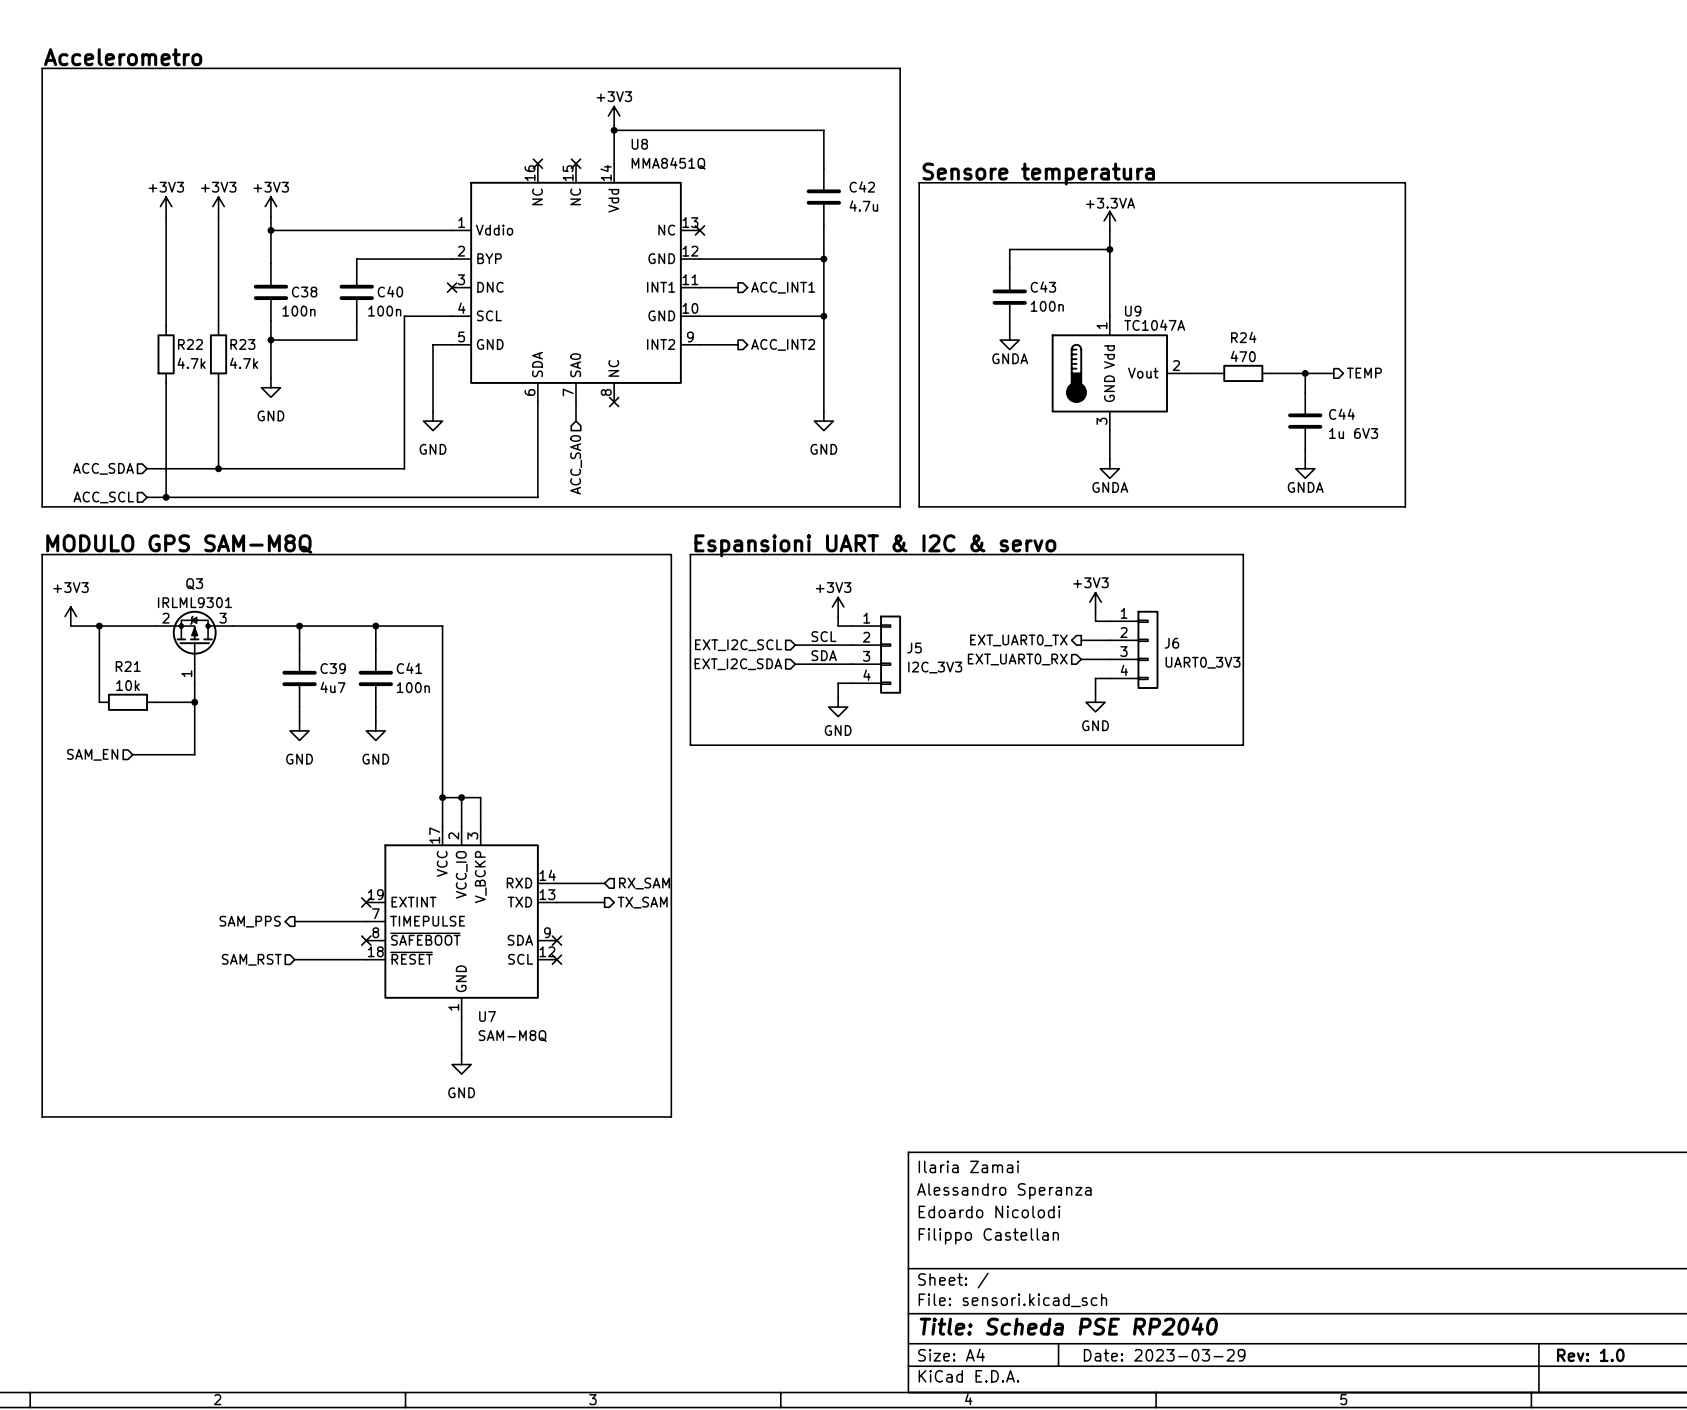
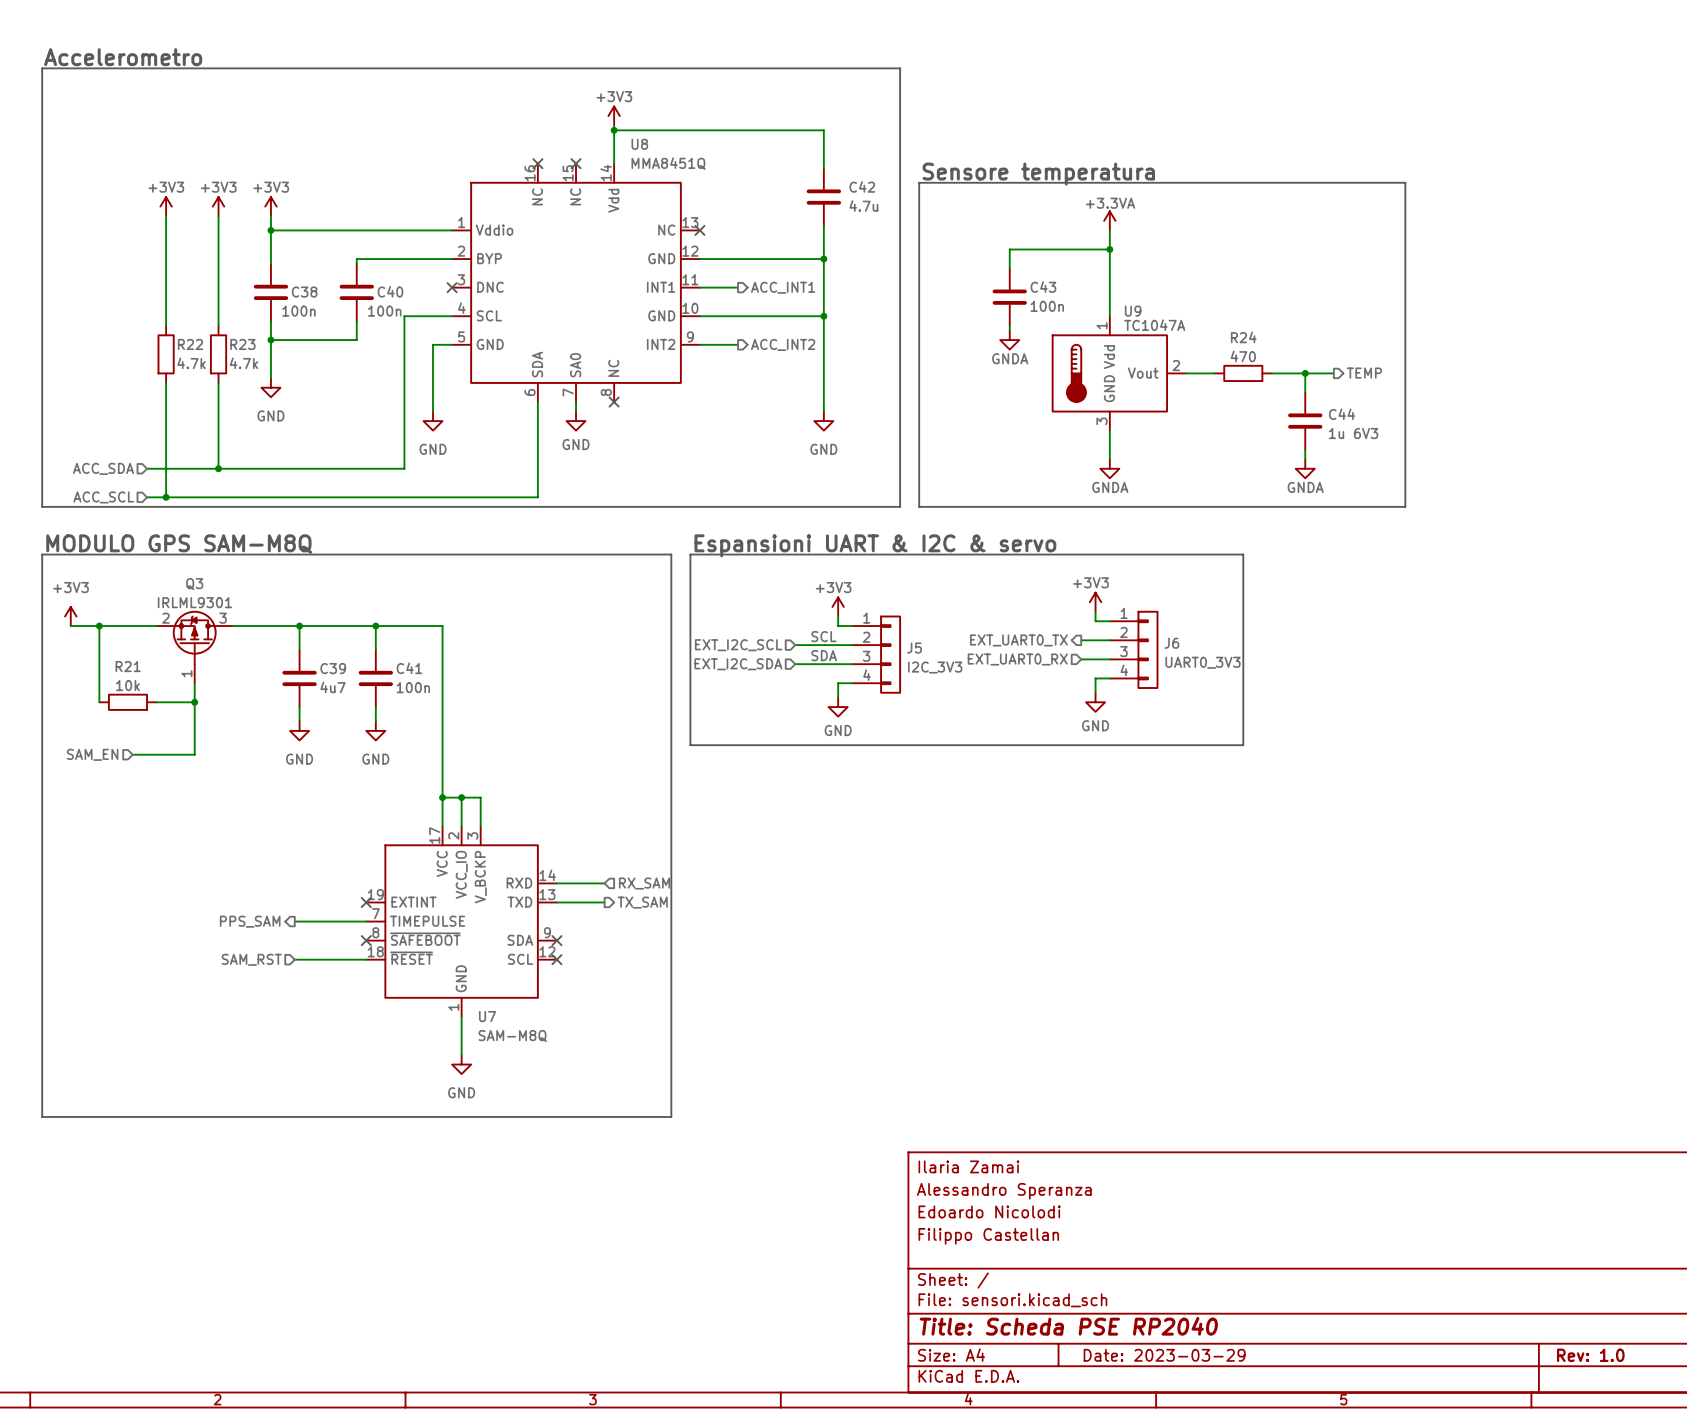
power symbol: none -> GND (576, 421)
hierarchical label: ACC_SA0 (576, 464) -> none
hierarchical label: SAM_PPS (250, 921) -> PPS_SAM (250, 921)

